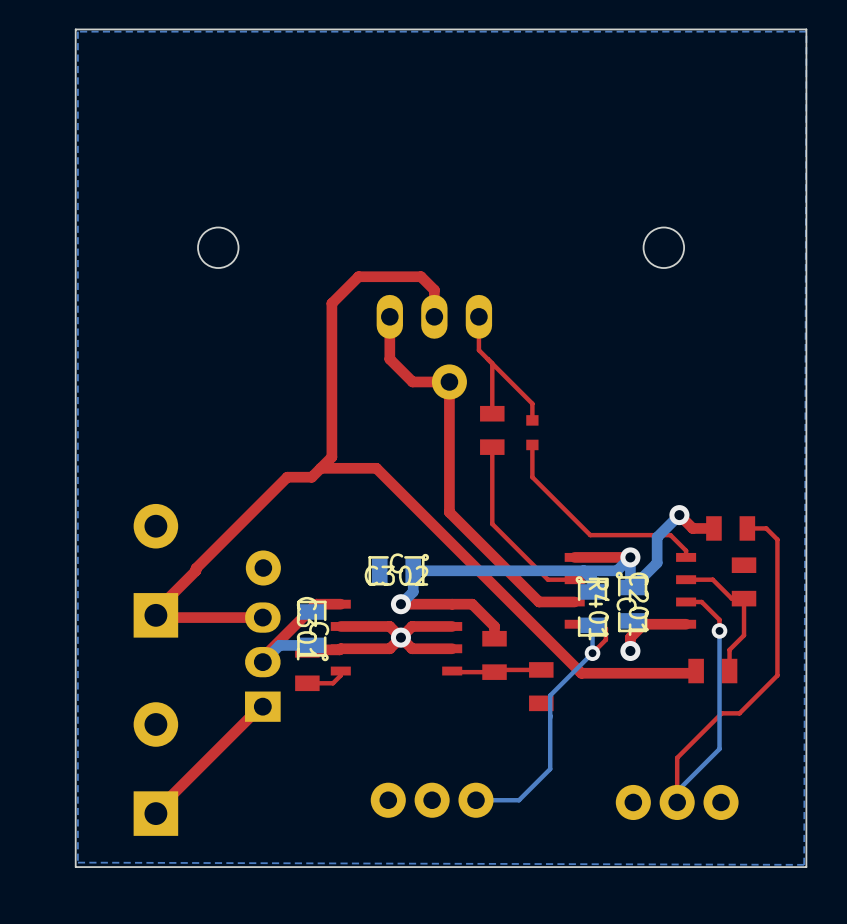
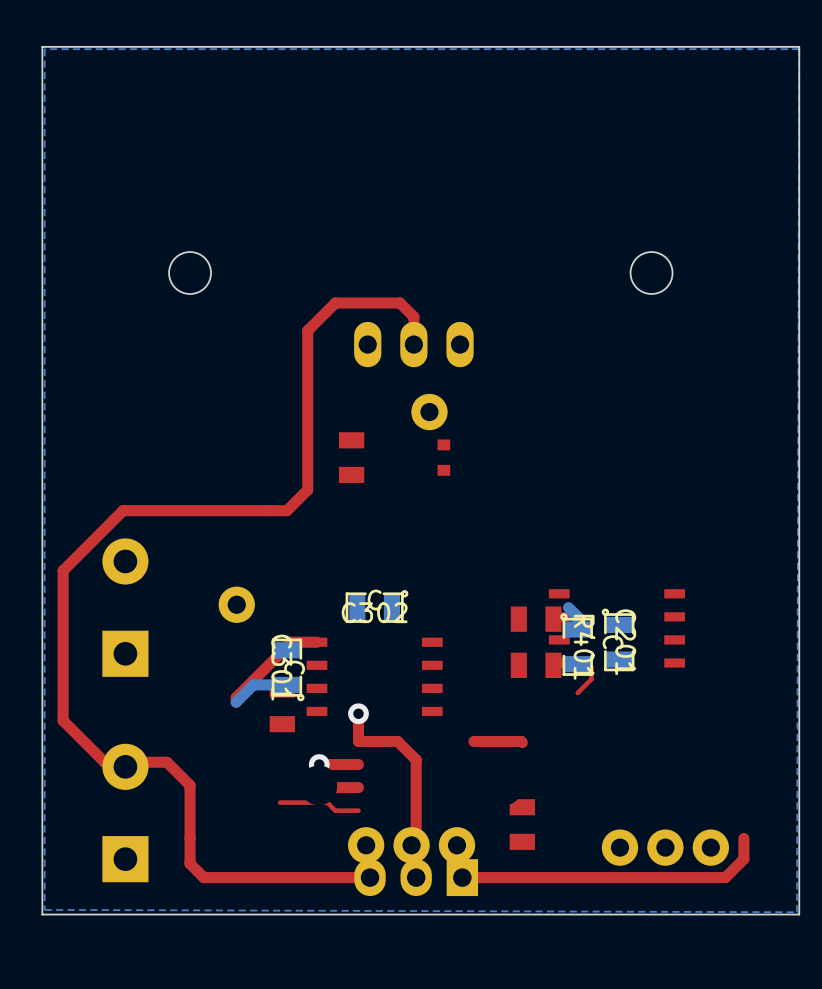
top track: (389, 316) (389, 359) (412, 381) (449, 381) (449, 512) (539, 601) (574, 601) -> none
top track: (478, 316) (478, 350) (532, 403) (532, 420) -> none
top track: (492, 363) (492, 413) -> none
part: none -> (351, 457)
part: (492, 430) -> none
part position: (532, 432) -> (443, 457)
top track: (532, 444) (532, 477) (590, 535) (670, 535) (686, 550) (686, 557) -> none
top track: (492, 447) (492, 524) (547, 579) (574, 579) -> none
top track: (320, 468) (376, 468) (581, 673) (693, 673) (696, 671) -> none
top track: (287, 477) (155, 610) (158, 617) (262, 617) -> (261, 510) (123, 510) (63, 570) (63, 720) (104, 762) (166, 762) (190, 785) (190, 863) (203, 877) (370, 877)
bottom track: (679, 515) (657, 537) (657, 562) (632, 587) (630, 585) (630, 557) (617, 570) (413, 570) (413, 591) (400, 604) -> none
top track: (679, 515) (692, 528) (713, 528) -> none
via: (679, 515) -> none
part: (730, 528) -> none
top track: (747, 528) (766, 528) (777, 539) (777, 675) (739, 713) (721, 713) (677, 757) (677, 802) -> none
top track: (630, 557) (574, 557) -> none
via: (630, 557) -> none
top track: (687, 580) (686, 579) (712, 579) (731, 598) (744, 598) (744, 635) (729, 649) (729, 671) -> none
part: none -> (536, 619)
part: (744, 581) -> none
top track: (686, 601) (701, 601) (719, 619) (719, 630) -> none
top track: (400, 604) (472, 604) (494, 626) (494, 638) -> none
via: (400, 604) -> none
top track: (686, 624) (643, 624) (630, 637) (630, 650) -> none
bottom track: (592, 625) (592, 653) (550, 695) (550, 769) (519, 800) (475, 800) -> none
top track: (340, 626) (389, 626) (412, 648) (452, 648) -> none
top track: (452, 626) (412, 626) (389, 648) (307, 649) -> none
part: none -> (536, 665)
bottom track: (719, 630) (719, 749) (677, 791) (677, 802) -> none
via: (719, 630) -> none
via: (400, 637) -> none
via: (630, 650) -> none
via: (592, 653) -> none
part: (494, 655) -> none
part rotation: 0° (262, 662) -> 90° counterclockwise (416, 877)
part position: (262, 662) -> (416, 877)
top track: (541, 669) (496, 669) (494, 672) (452, 671) -> none
top track: (340, 671) (340, 675) (333, 683) (307, 683) -> none
part: (712, 671) -> none
top track: none -> (358, 713) (358, 741) (397, 741) (416, 759) (416, 877)
via: none -> (358, 713)
part: (541, 686) -> none
top track: none -> (473, 741) (522, 742)
top track: (262, 706) (260, 706) (155, 811) (155, 813) -> none
via: none -> (319, 764)
top track: none -> (358, 764) (319, 764) (319, 780) (326, 787) (358, 787)
top track: none -> (280, 802) (327, 802) (335, 810) (358, 810)
part: none -> (522, 824)
top track: none -> (743, 838) (743, 859) (725, 877) (462, 877)

